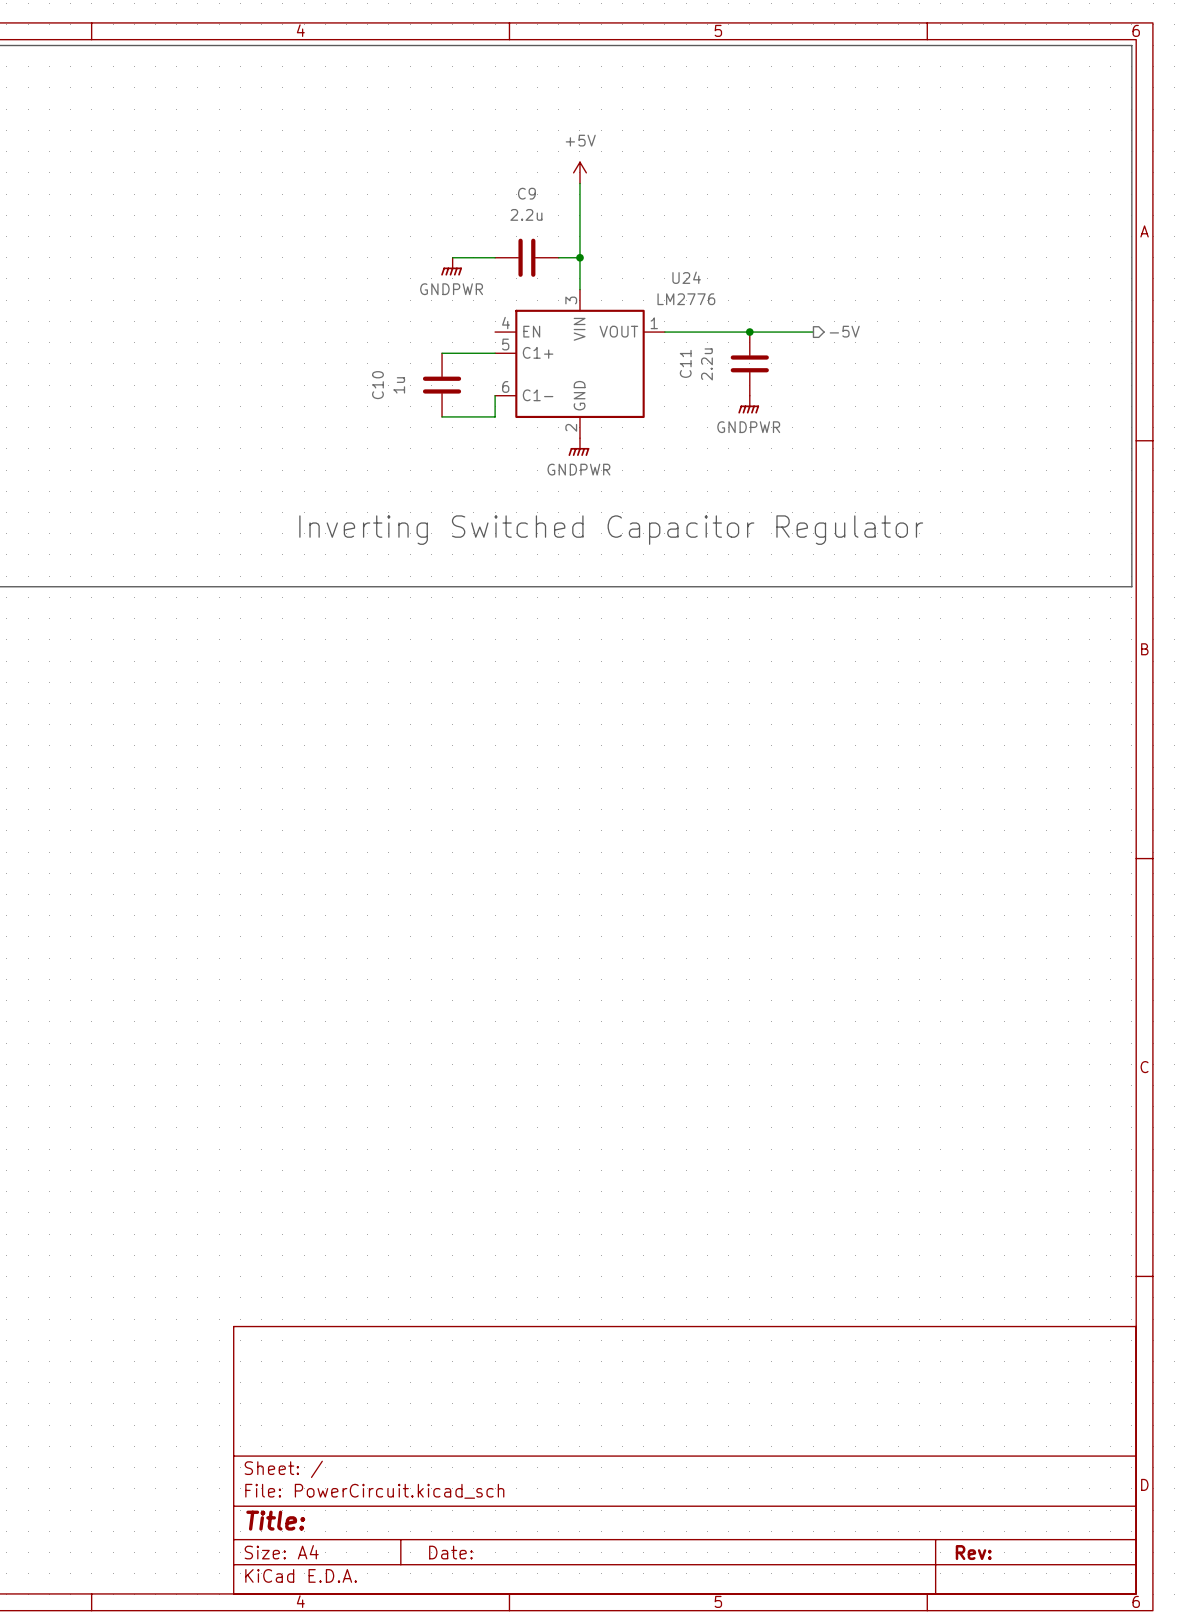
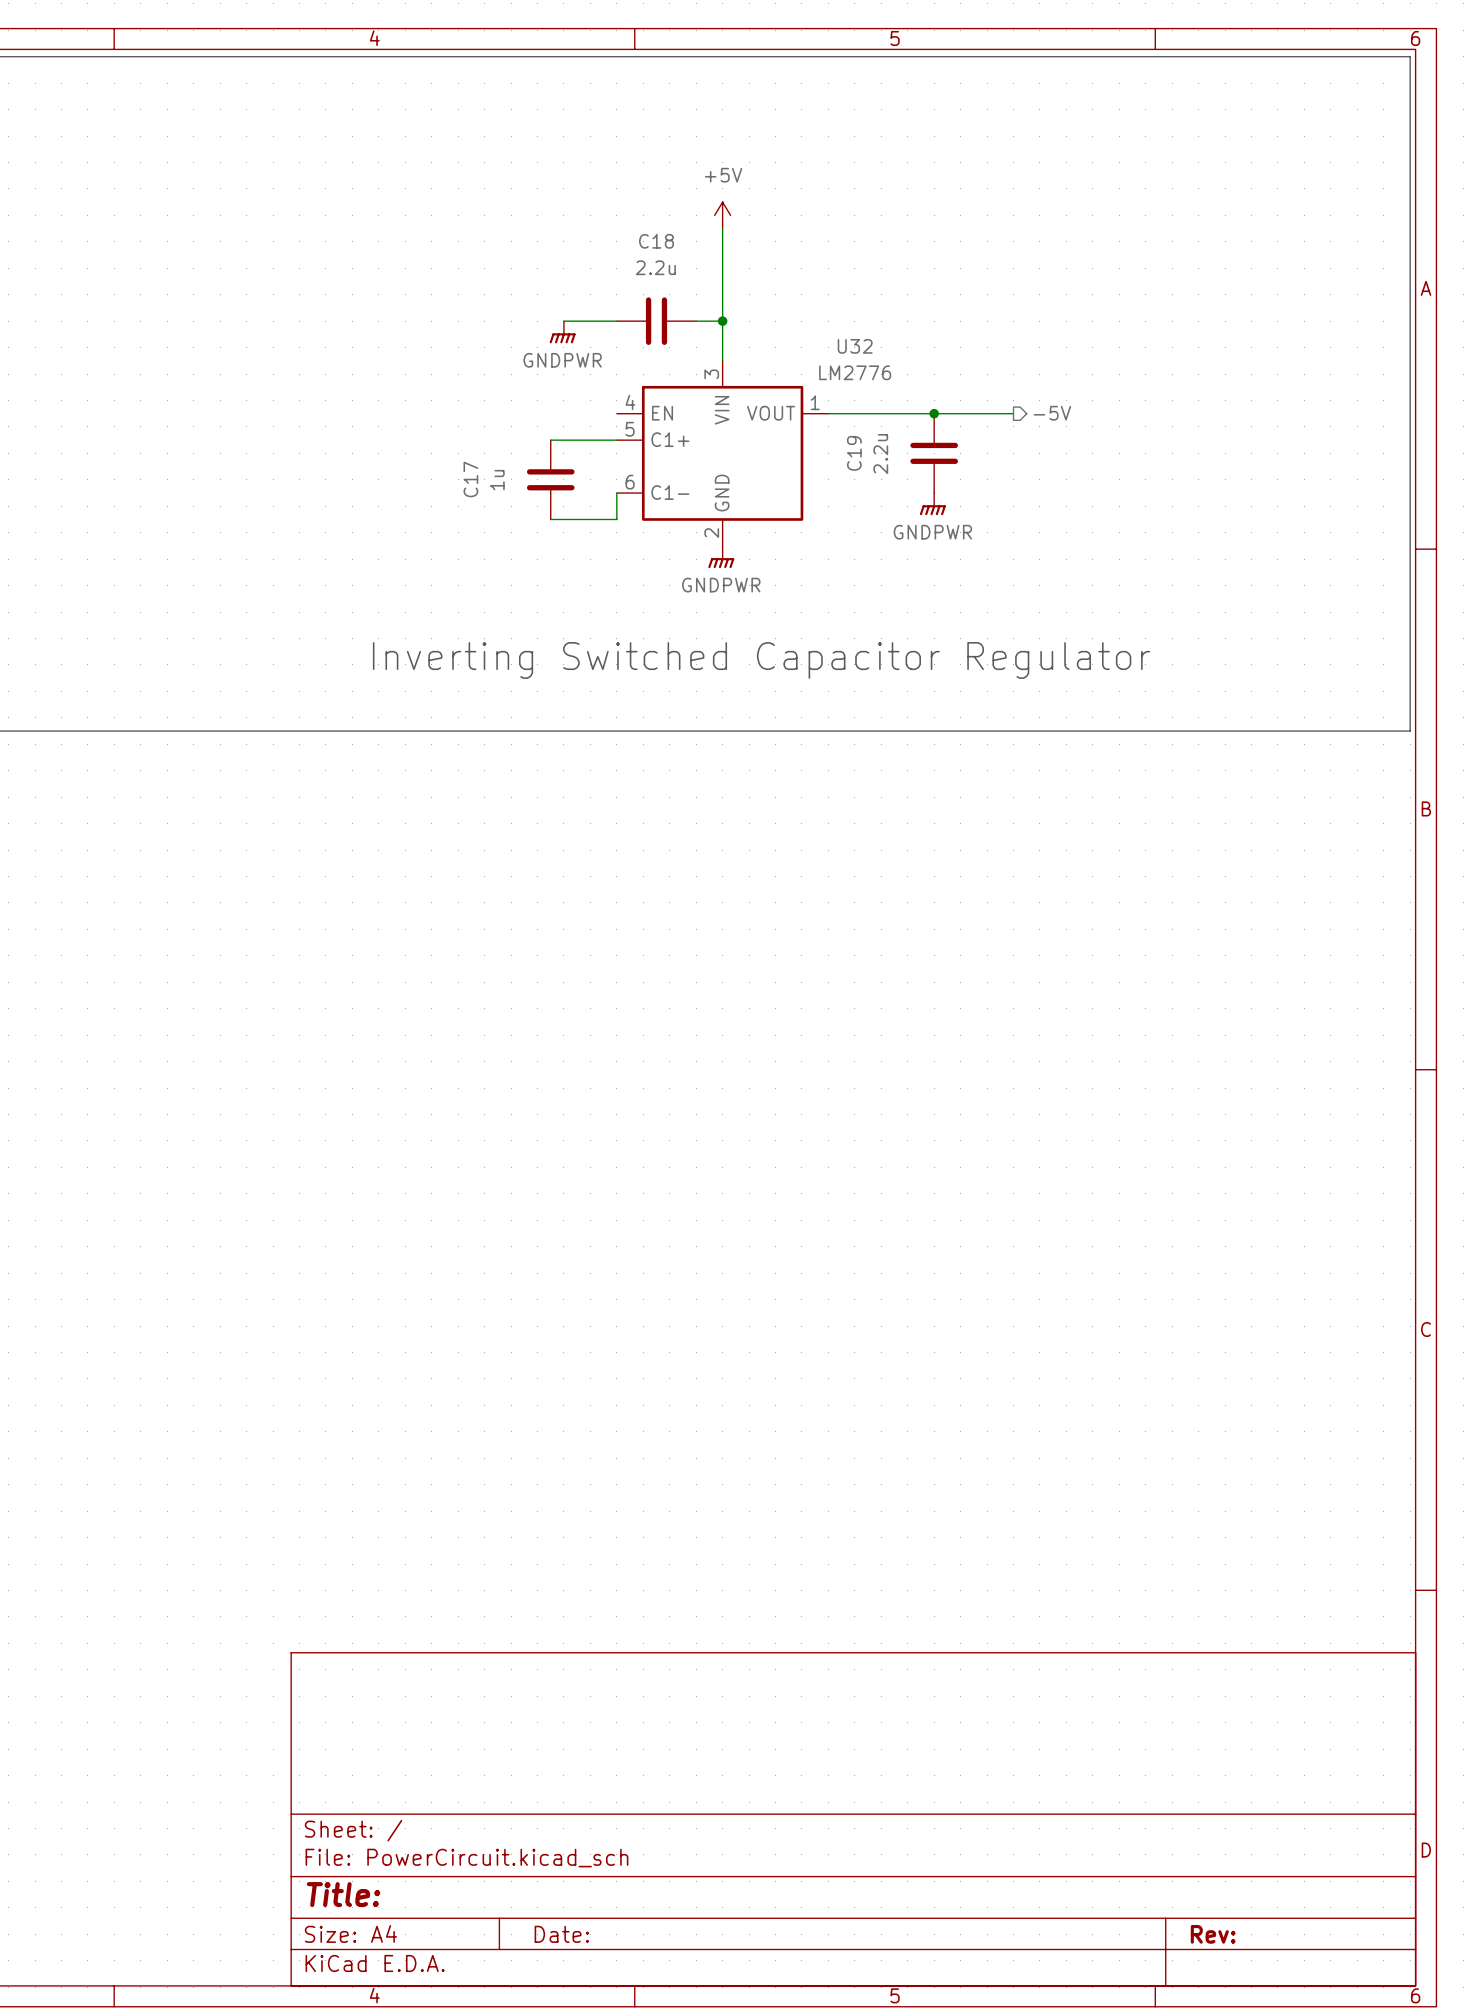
C9 name: C9 (526, 193) -> C18 (656, 241)
U24 name: U24 (686, 277) -> U32 (855, 346)
C11 name: C11 (685, 363) -> C19 (854, 453)
C10 name: C10 (377, 385) -> C17 (470, 479)

